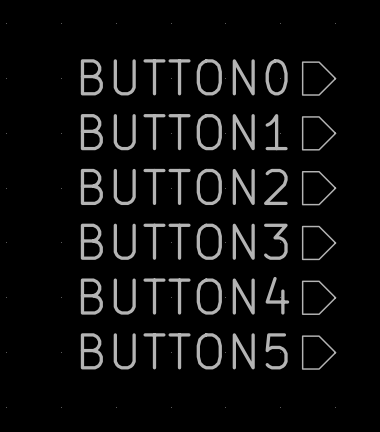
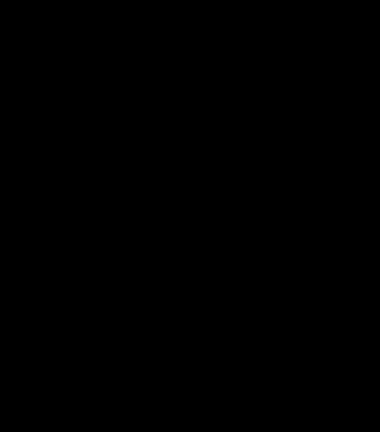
hierarchical label: BUTTON0 (184, 77) -> none
hierarchical label: BUTTON1 (184, 132) -> none
hierarchical label: BUTTON2 (184, 186) -> none
hierarchical label: BUTTON3 (184, 241) -> none
hierarchical label: BUTTON4 (185, 295) -> none
hierarchical label: BUTTON5 (184, 351) -> none

